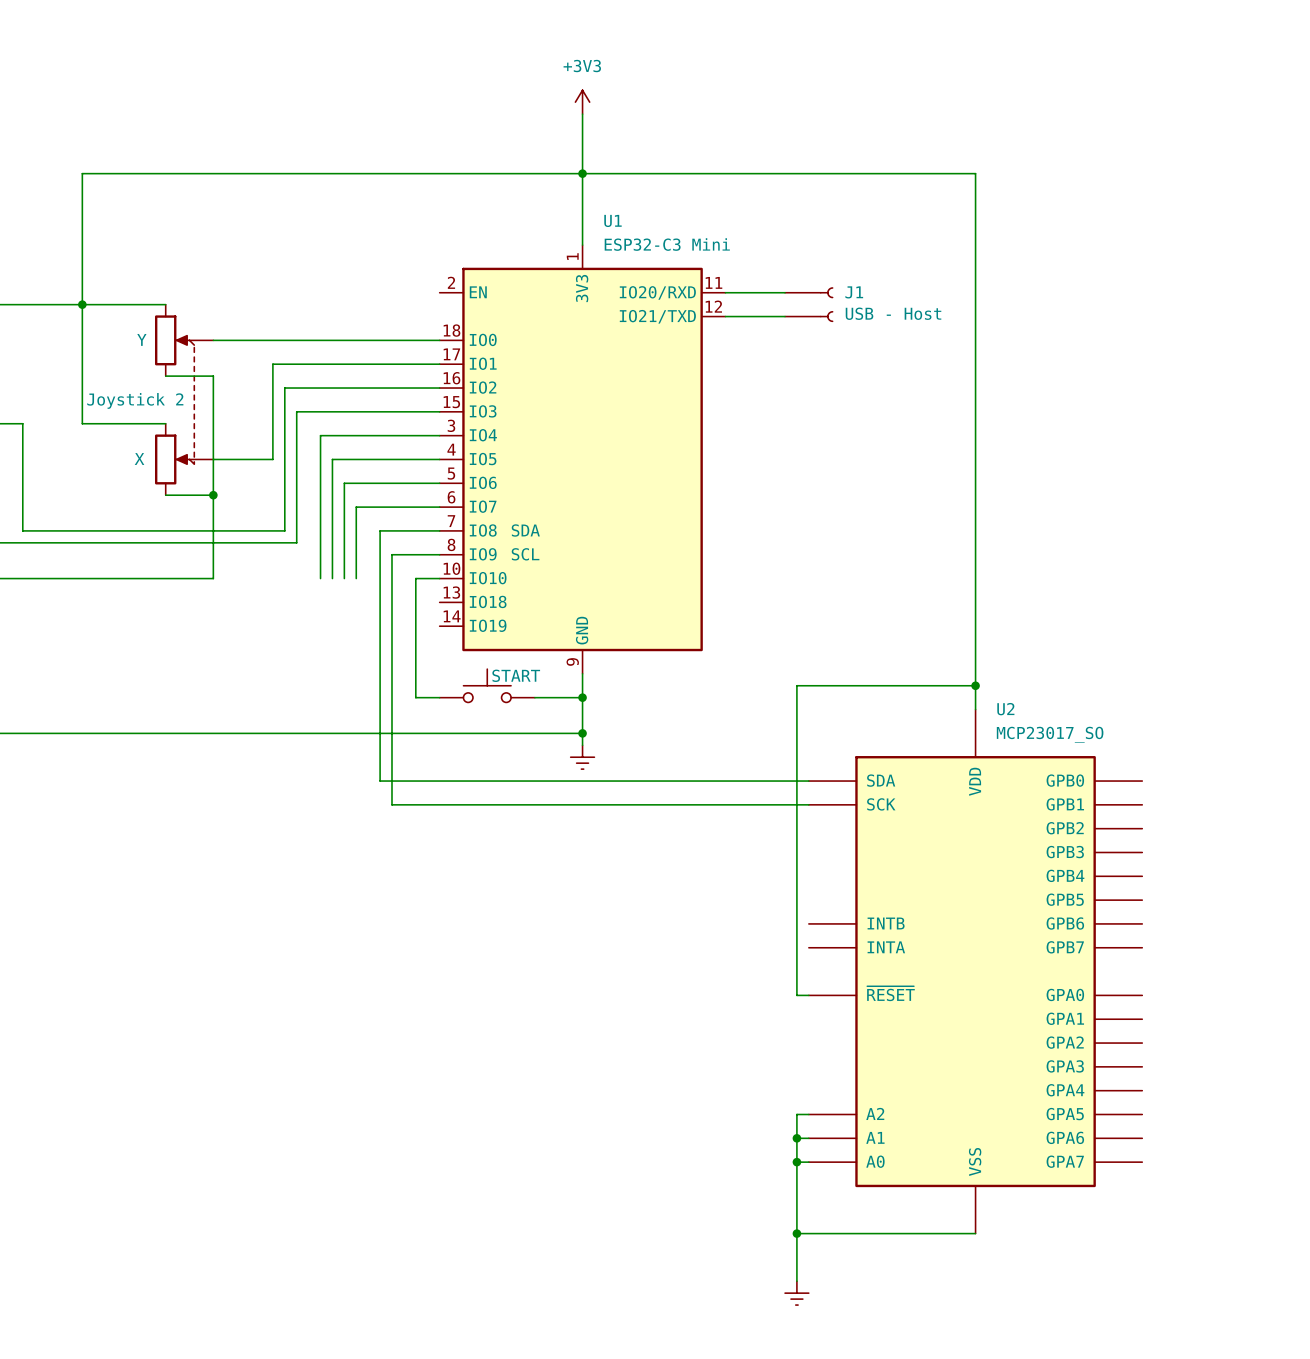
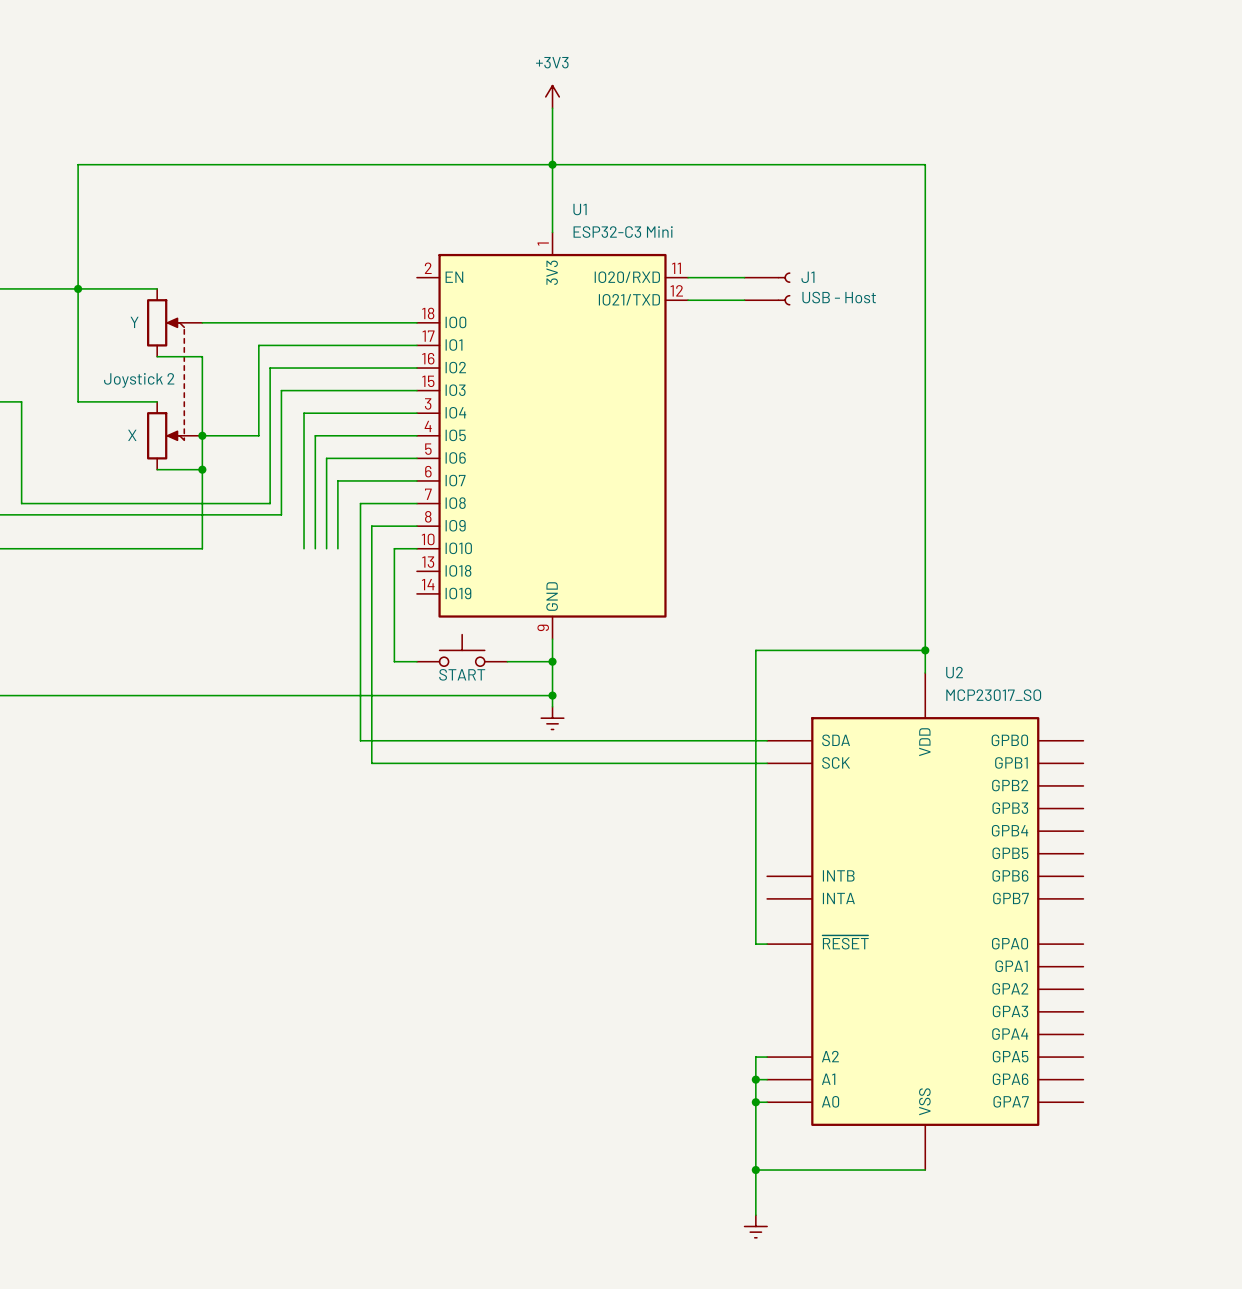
junction: none -> (202, 435)
U1 text: SDA (525, 530) -> none
U1 text: SCL (525, 554) -> none
part value position: START (516, 675) -> START (462, 674)

